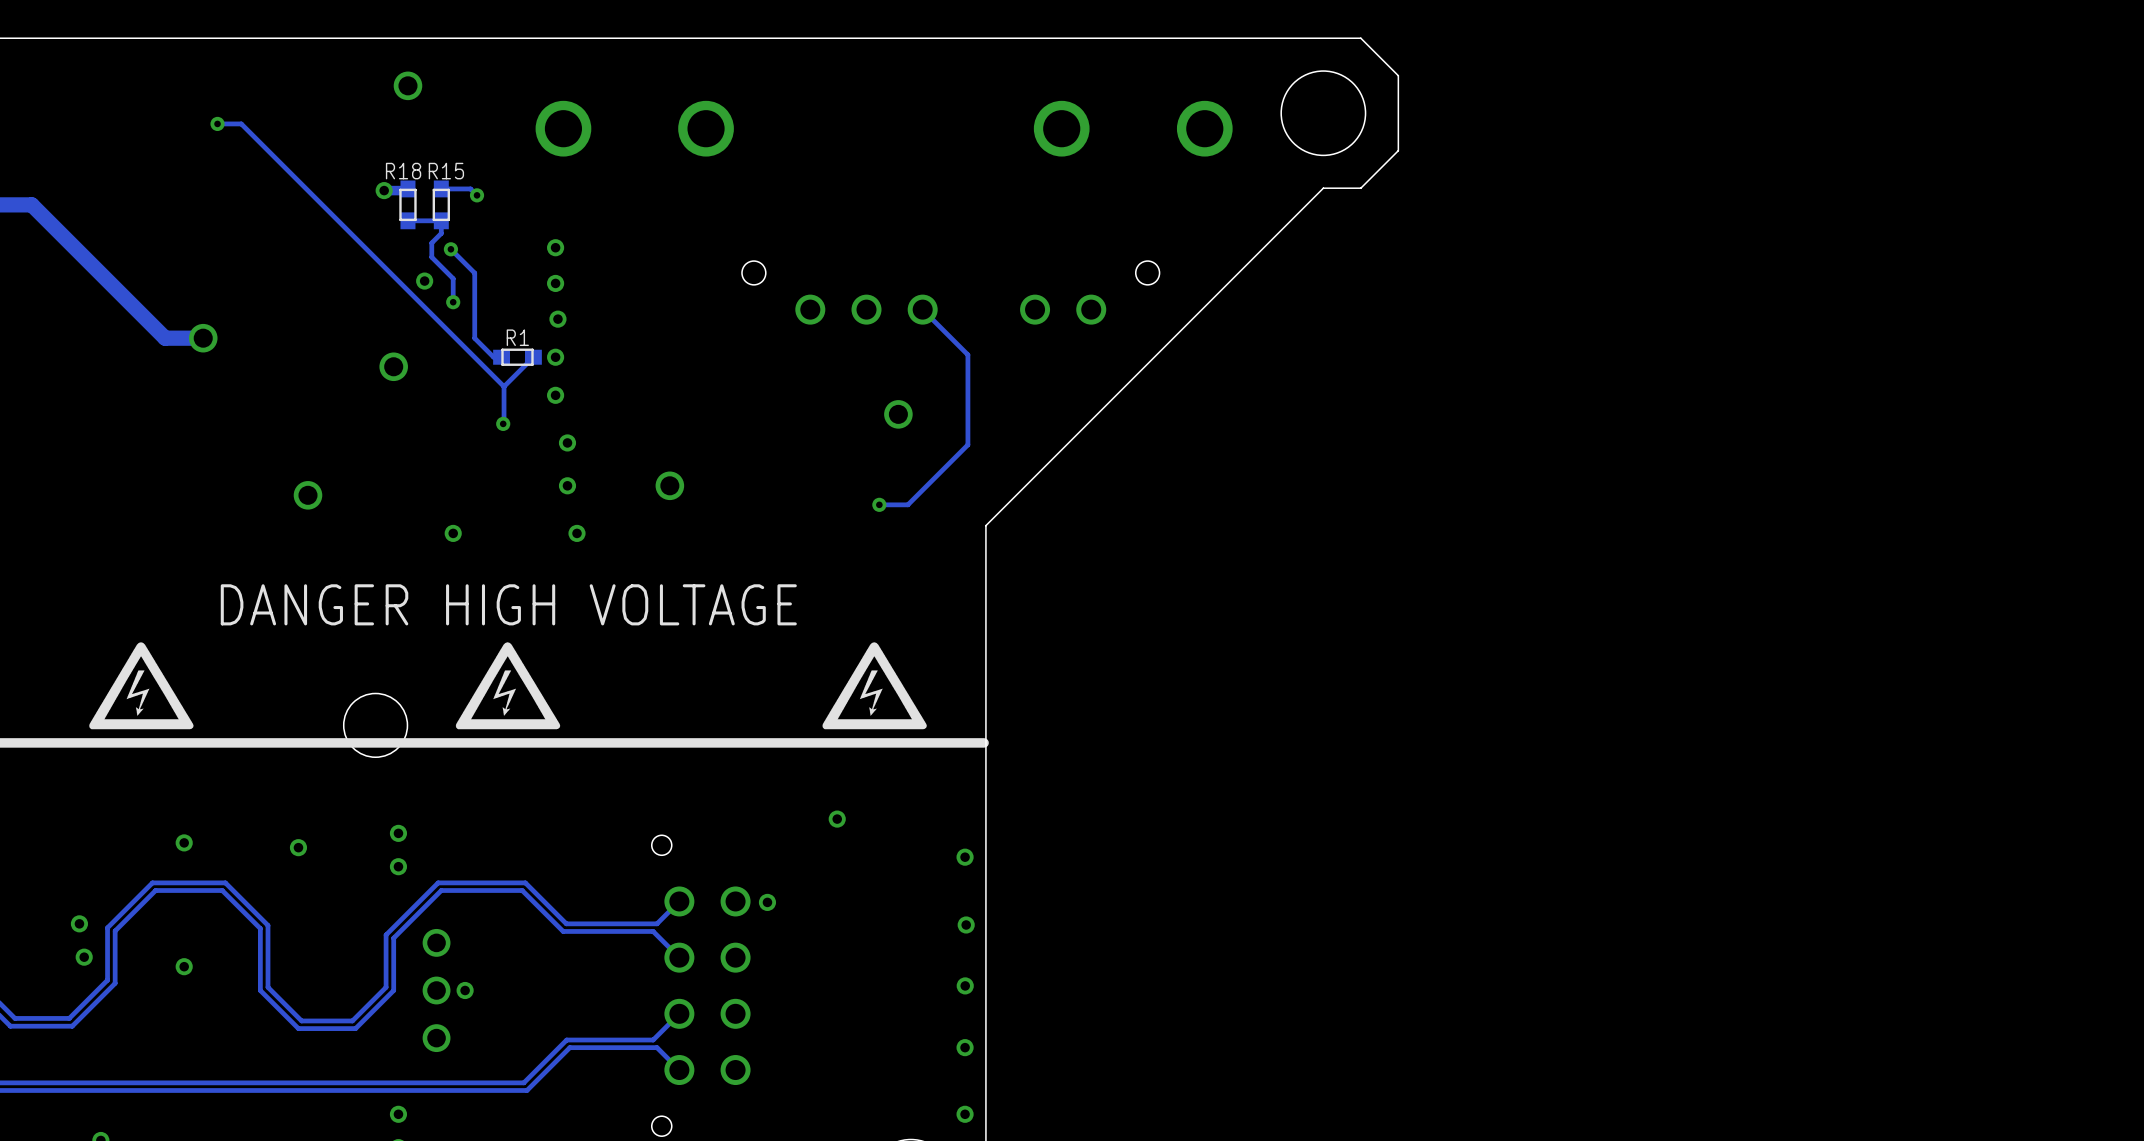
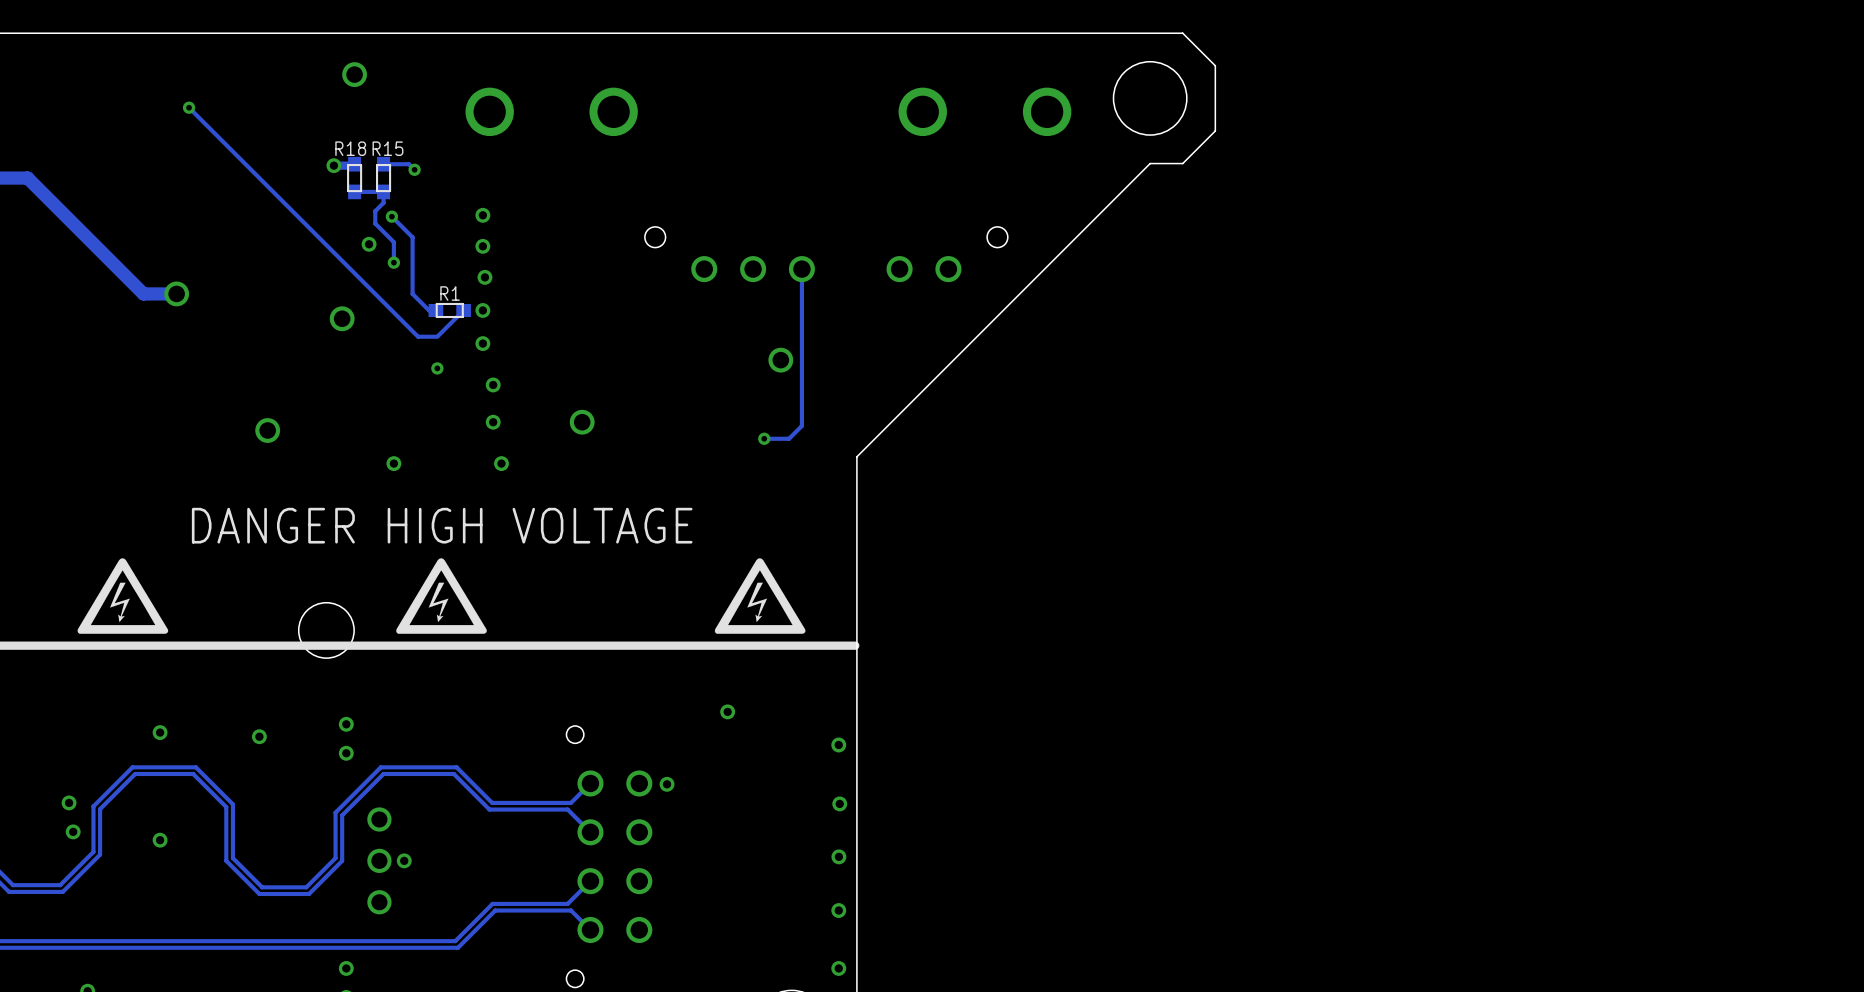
track: (217, 123) (241, 123) (504, 386) (503, 423) -> (189, 107) (418, 336) (437, 336)
track: (922, 309) (967, 354) (967, 444) (922, 490) -> (801, 269) (801, 425)

